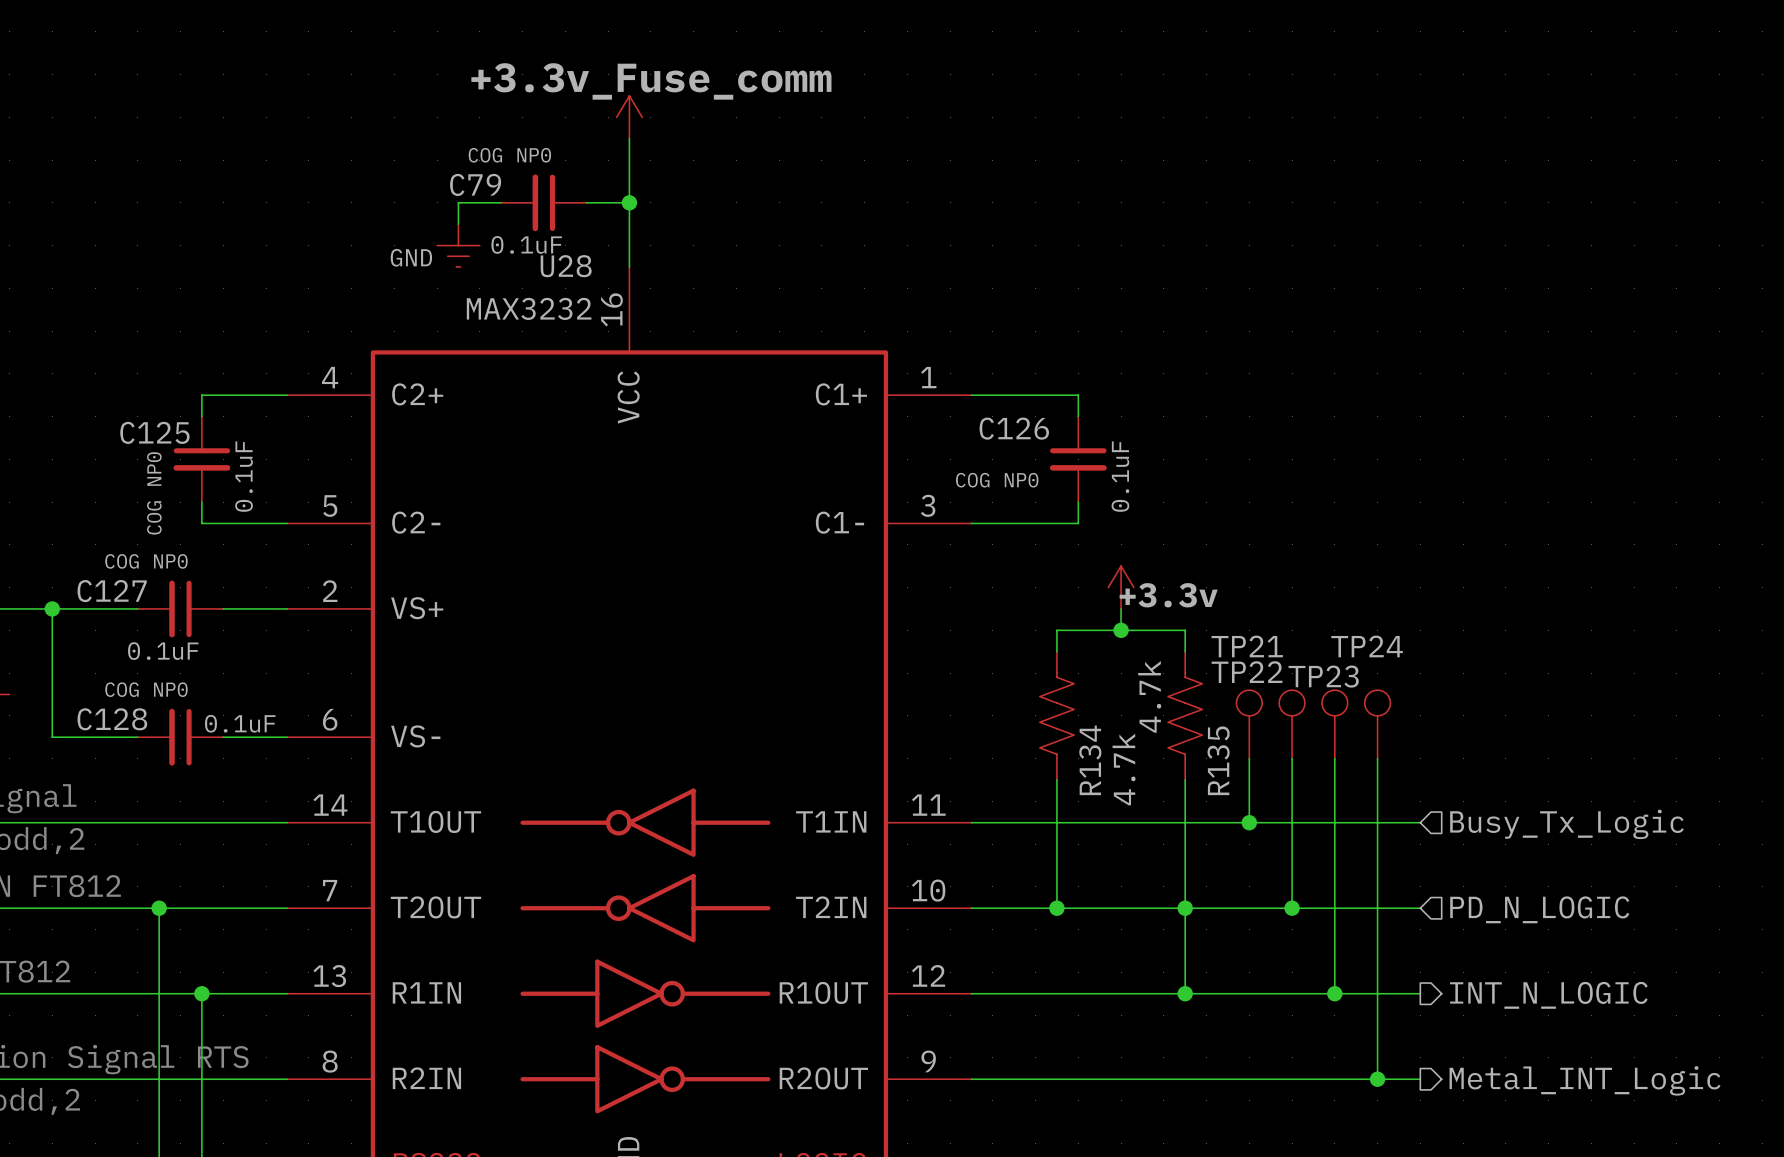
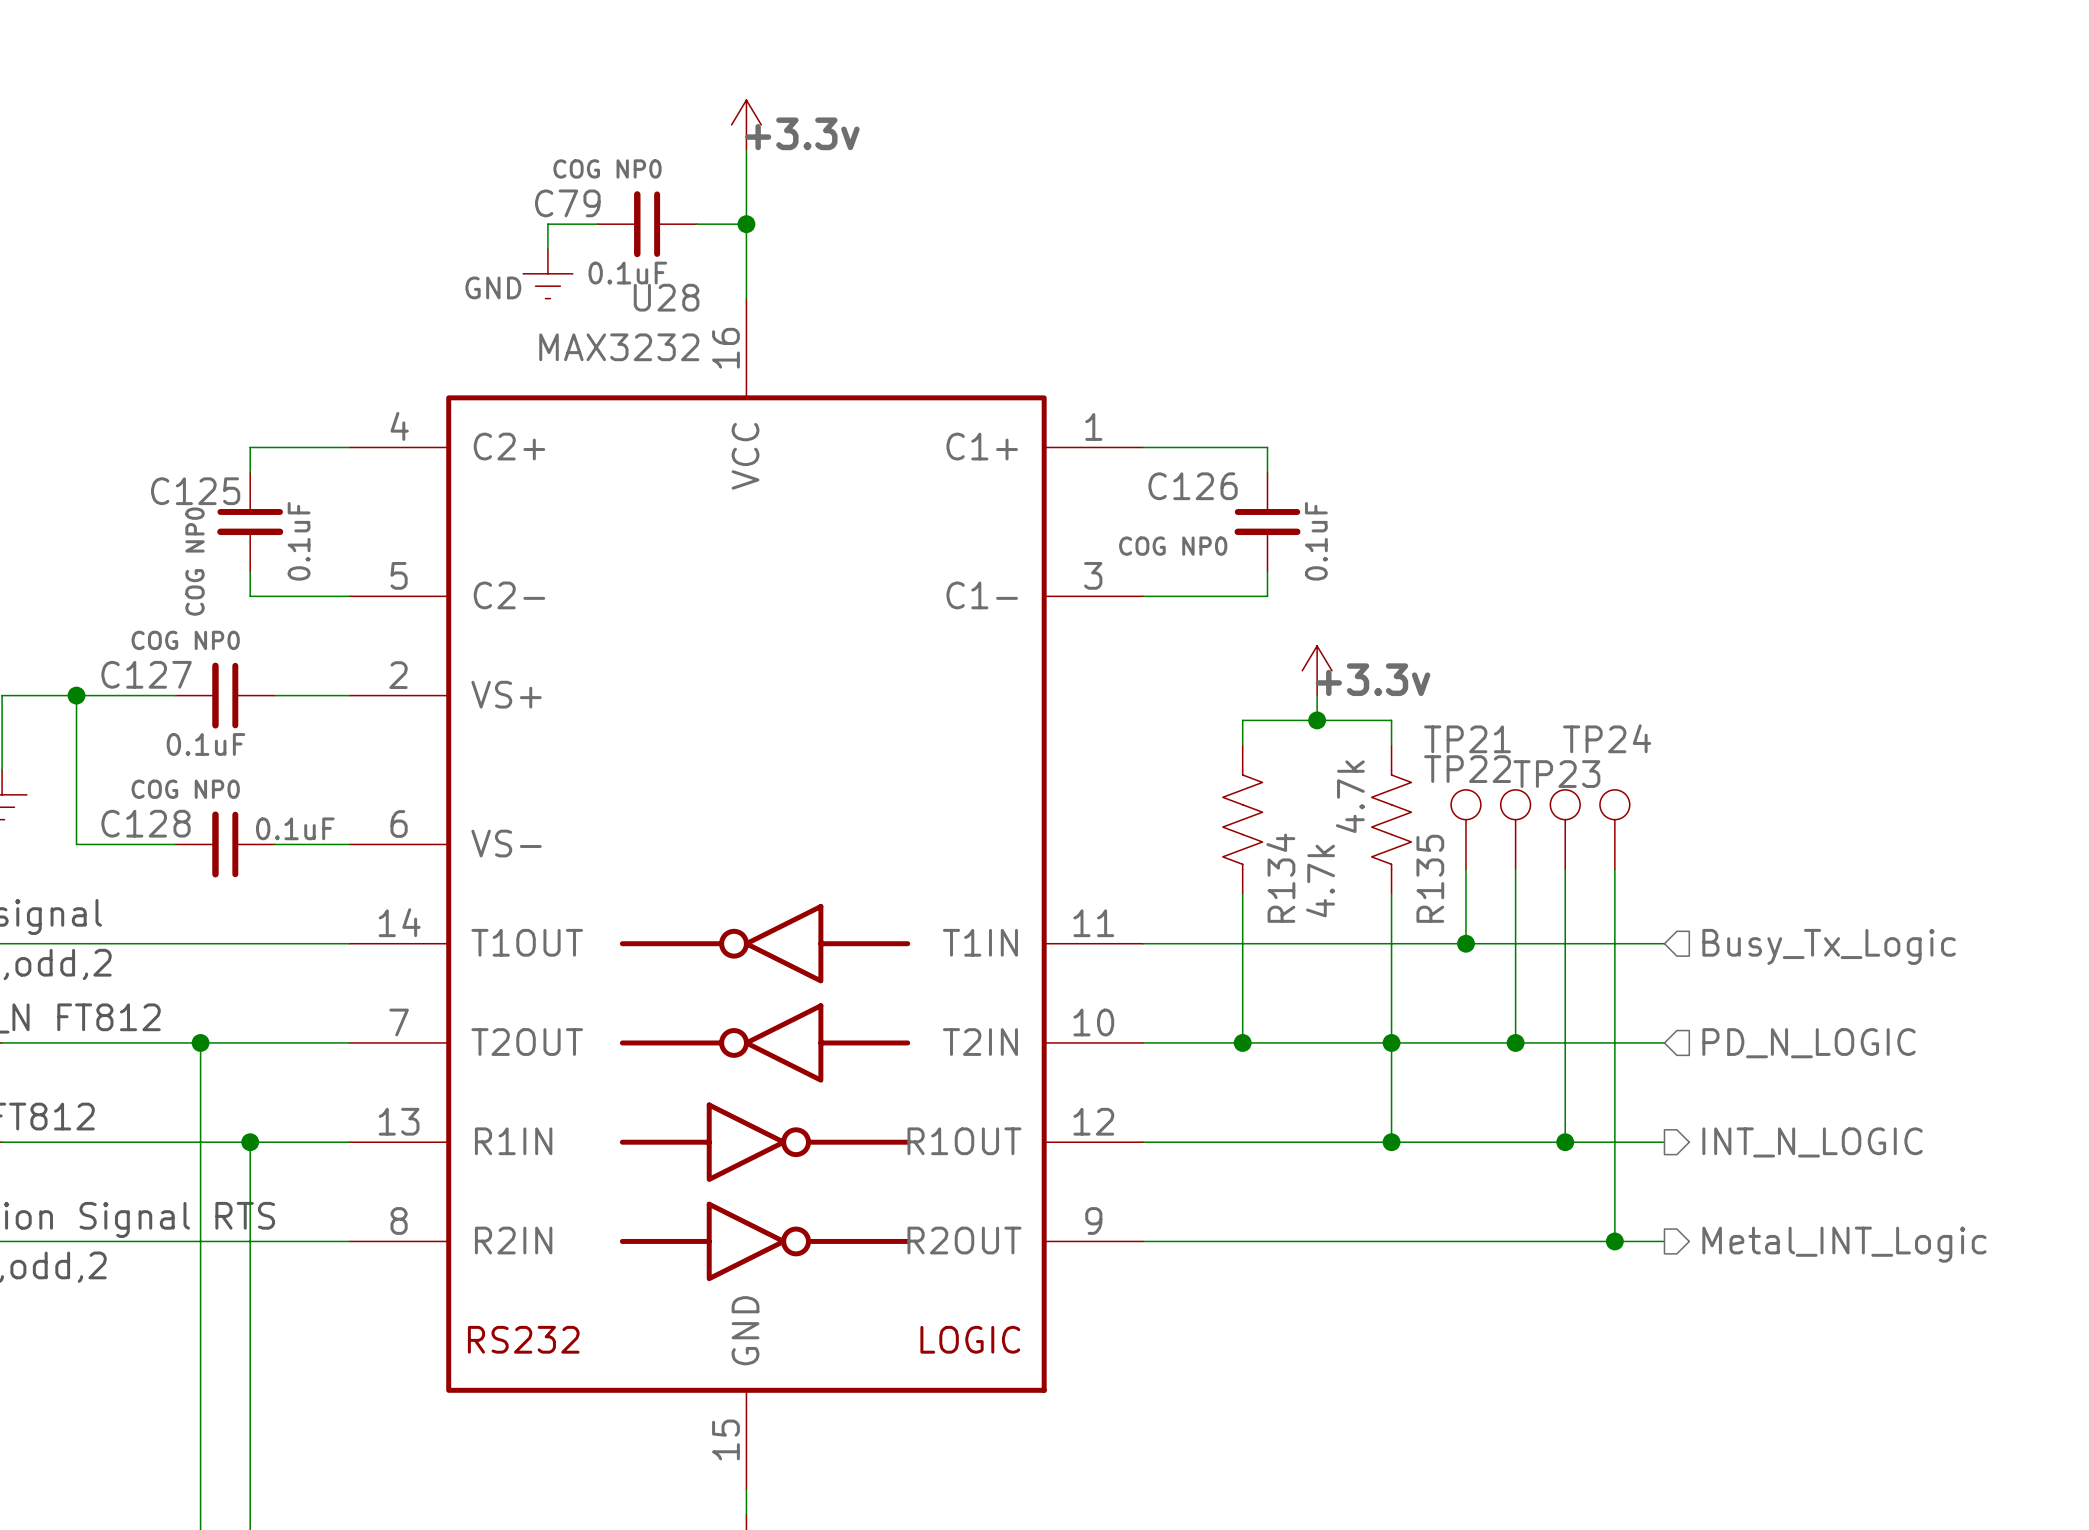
power symbol: +3.3v_Fuse_comm (629, 117) -> +3.3v (746, 124)

